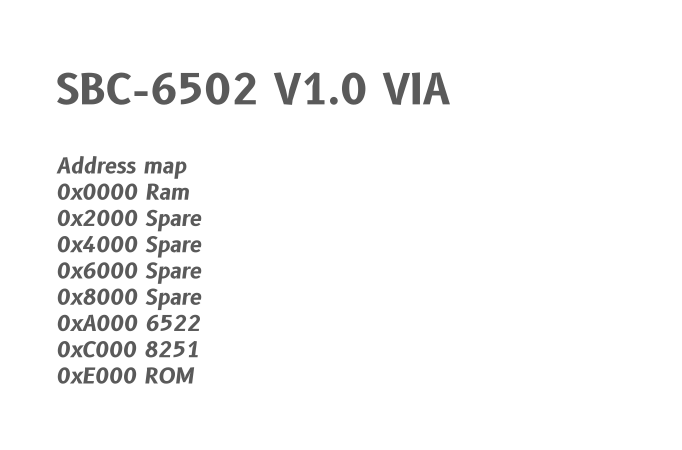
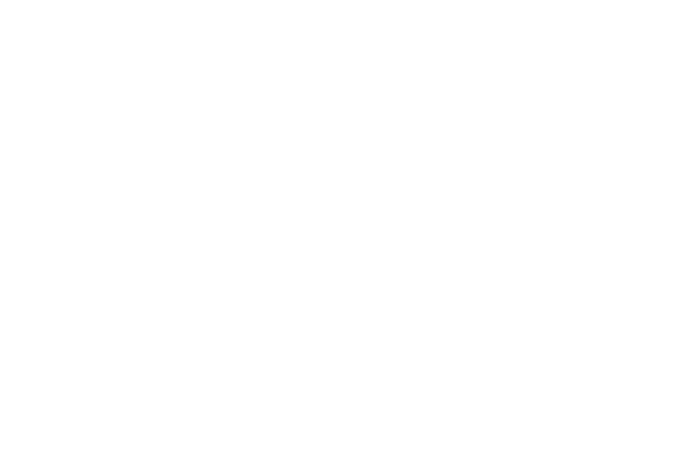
text: SBC-6502 V1.0 VIA (253, 88) -> none
text: Address map (121, 167) -> none
text: 0x0000 Ram (123, 191) -> none
text: 0x2000 Spare (129, 220) -> none
text: 0x4000 Spare (129, 246) -> none
text: 0x6000 Spare (129, 273) -> none
text: 0x8000 Spare (129, 299) -> none
text: 0xA000 6522 (128, 322) -> none
text: 0xC000 8251 (127, 349) -> none
text: 0xE000 ROM (125, 375) -> none

